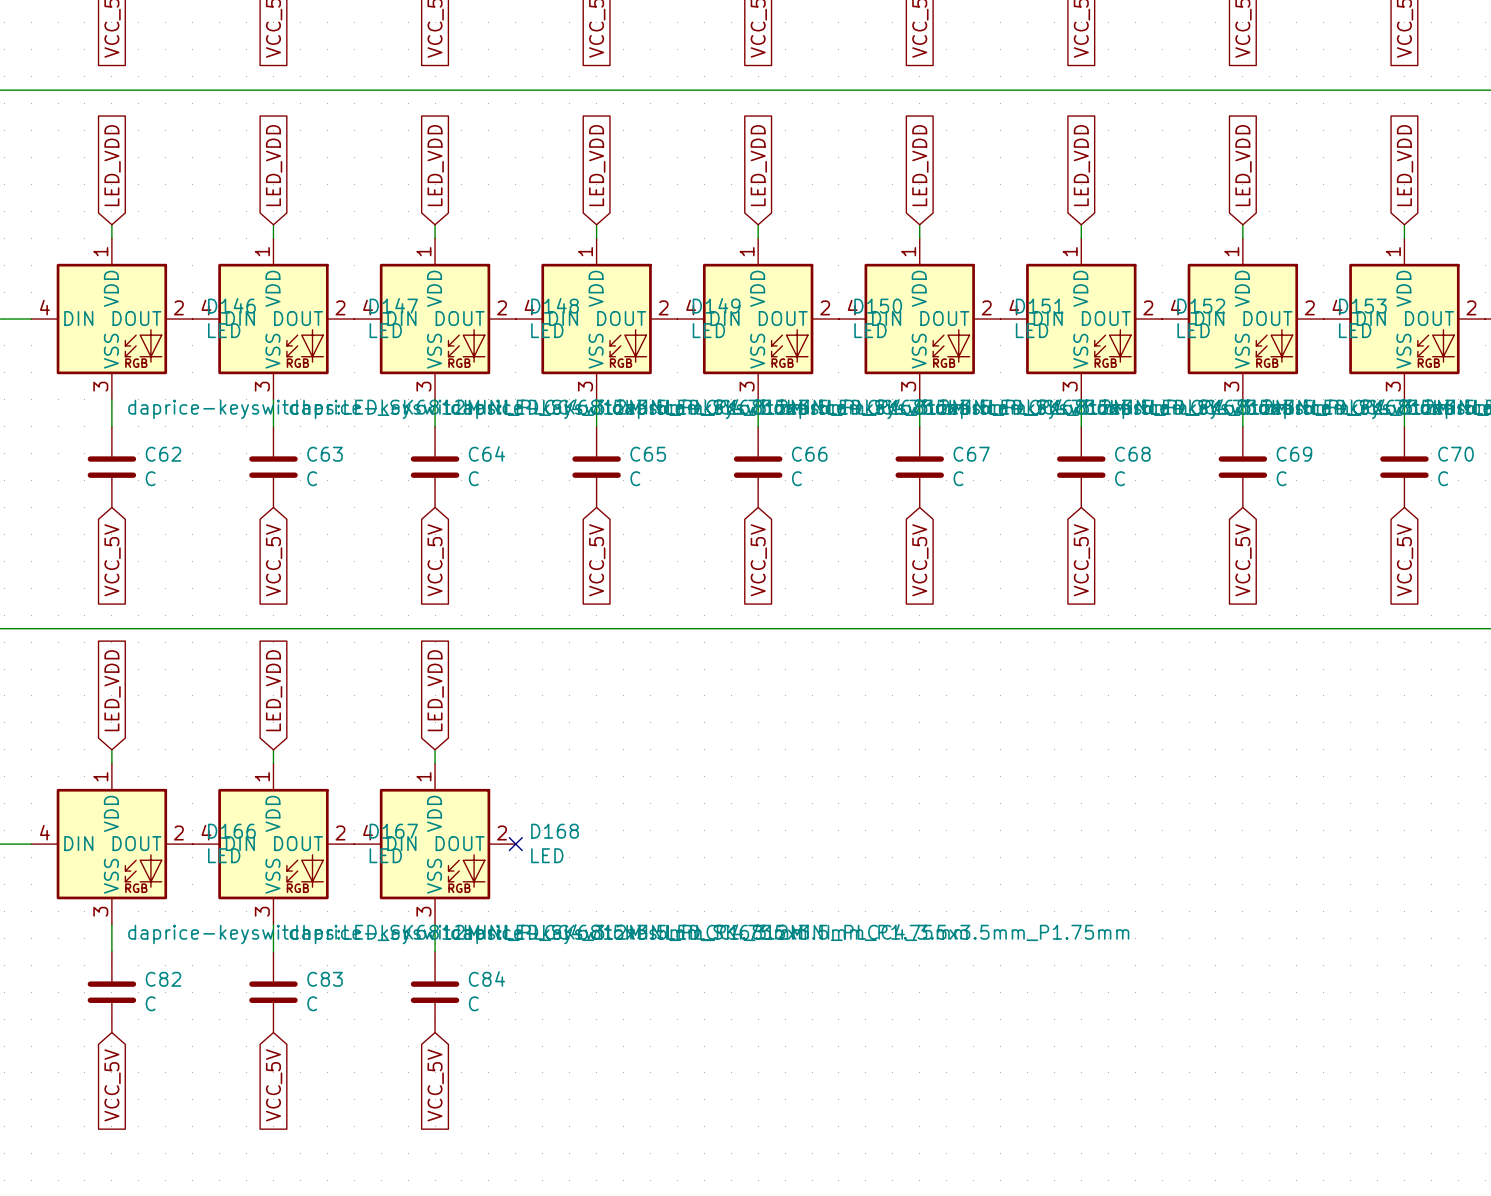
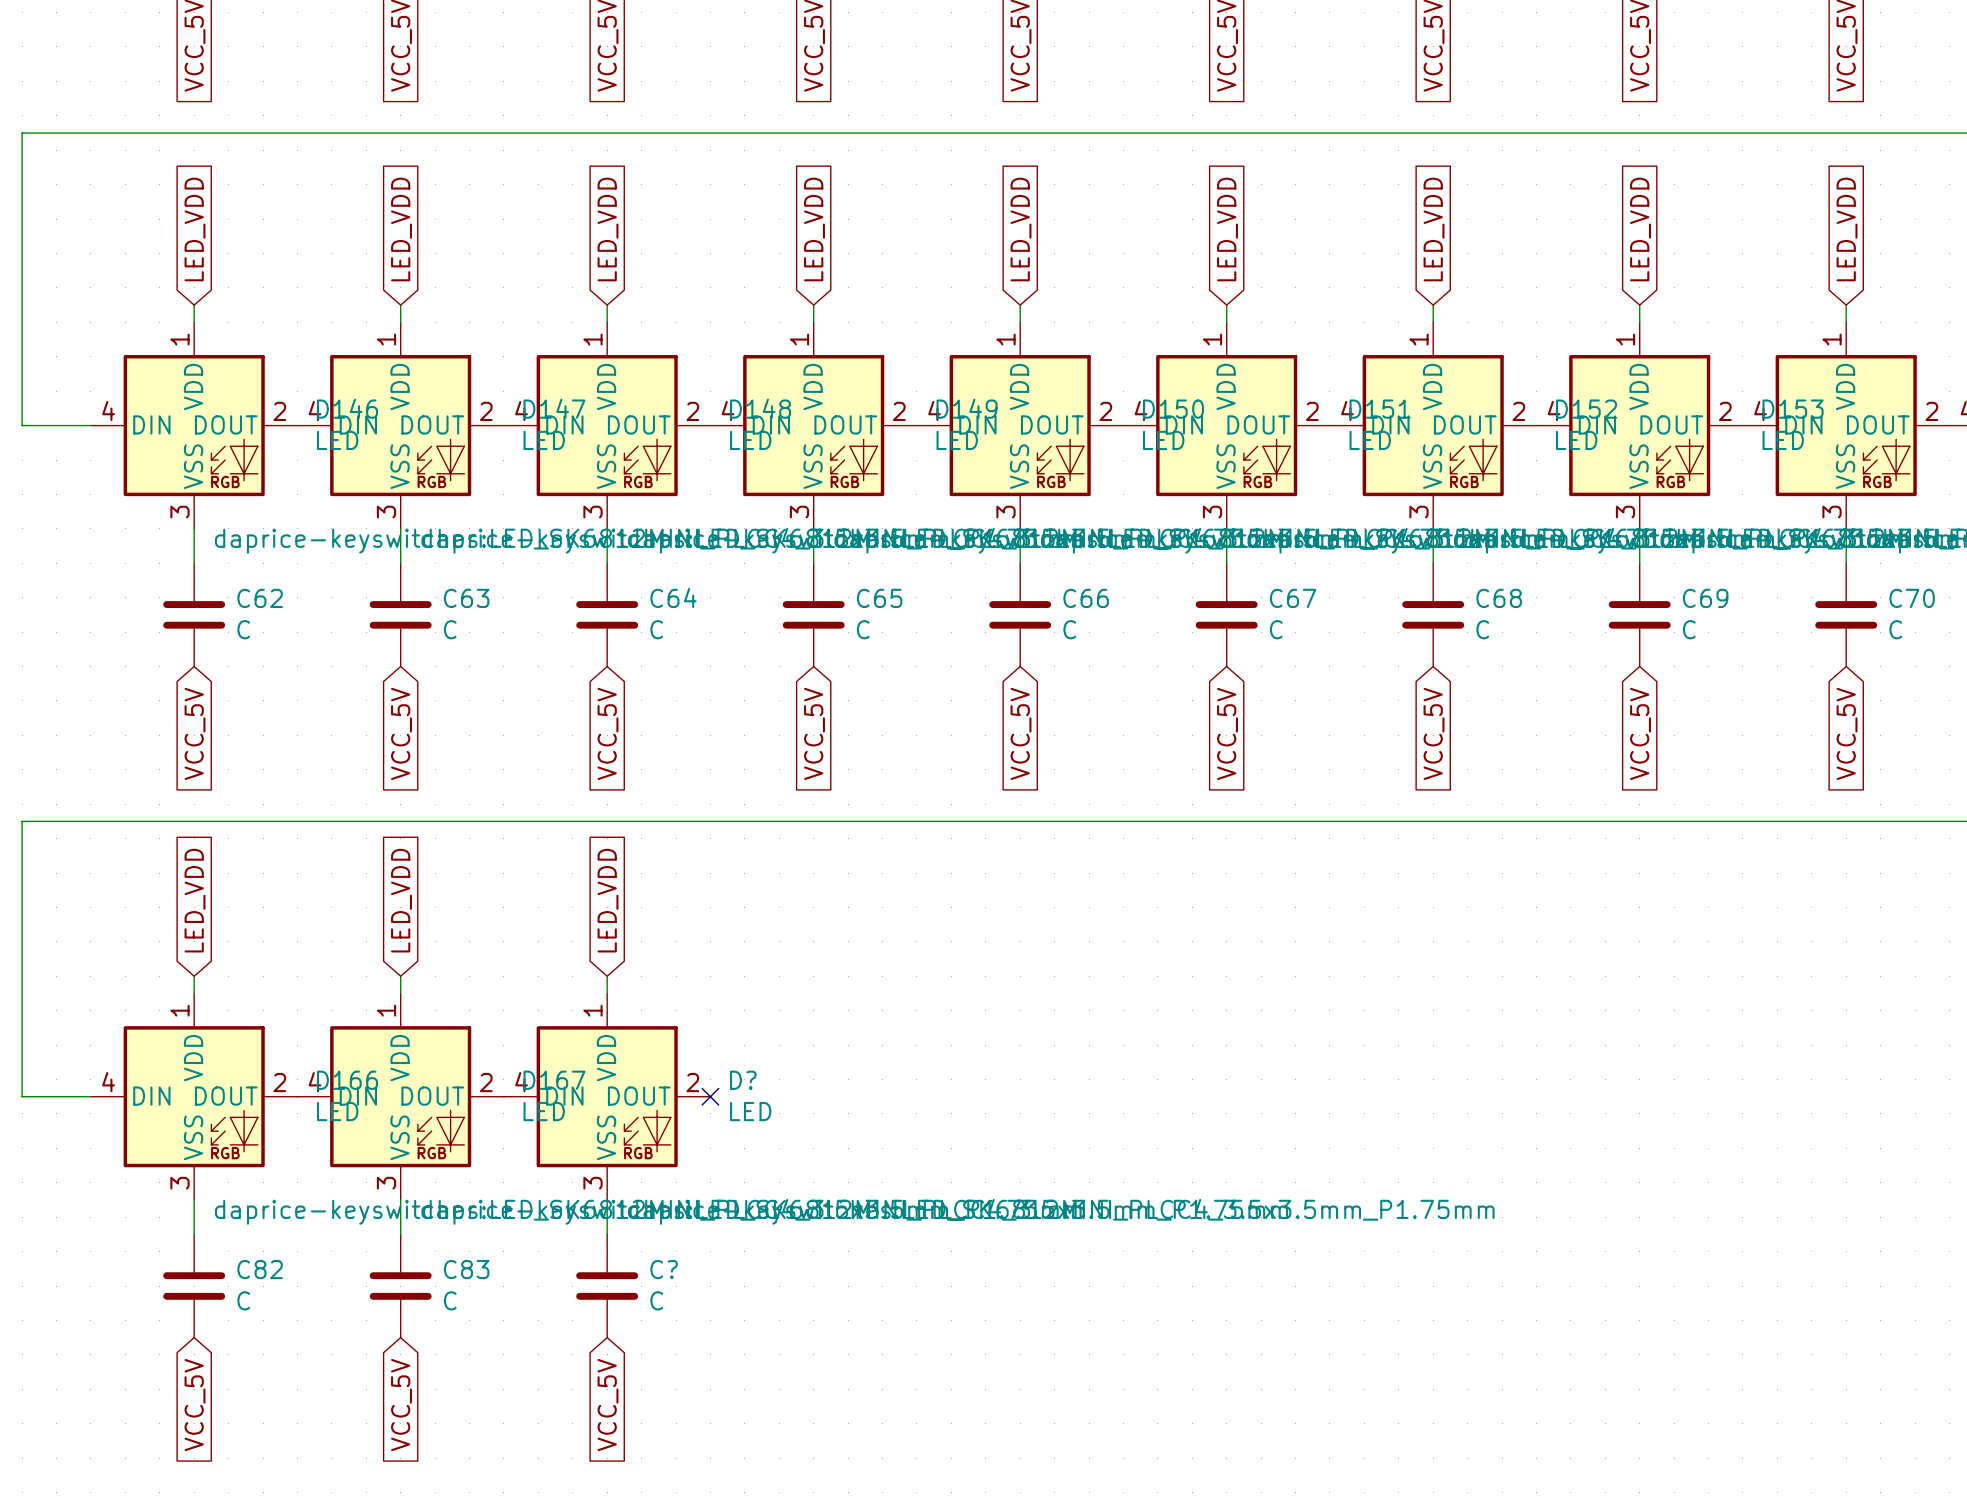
D168 name: D168 (555, 831) -> D? (743, 1080)
C84 name: C84 (486, 978) -> C? (664, 1269)

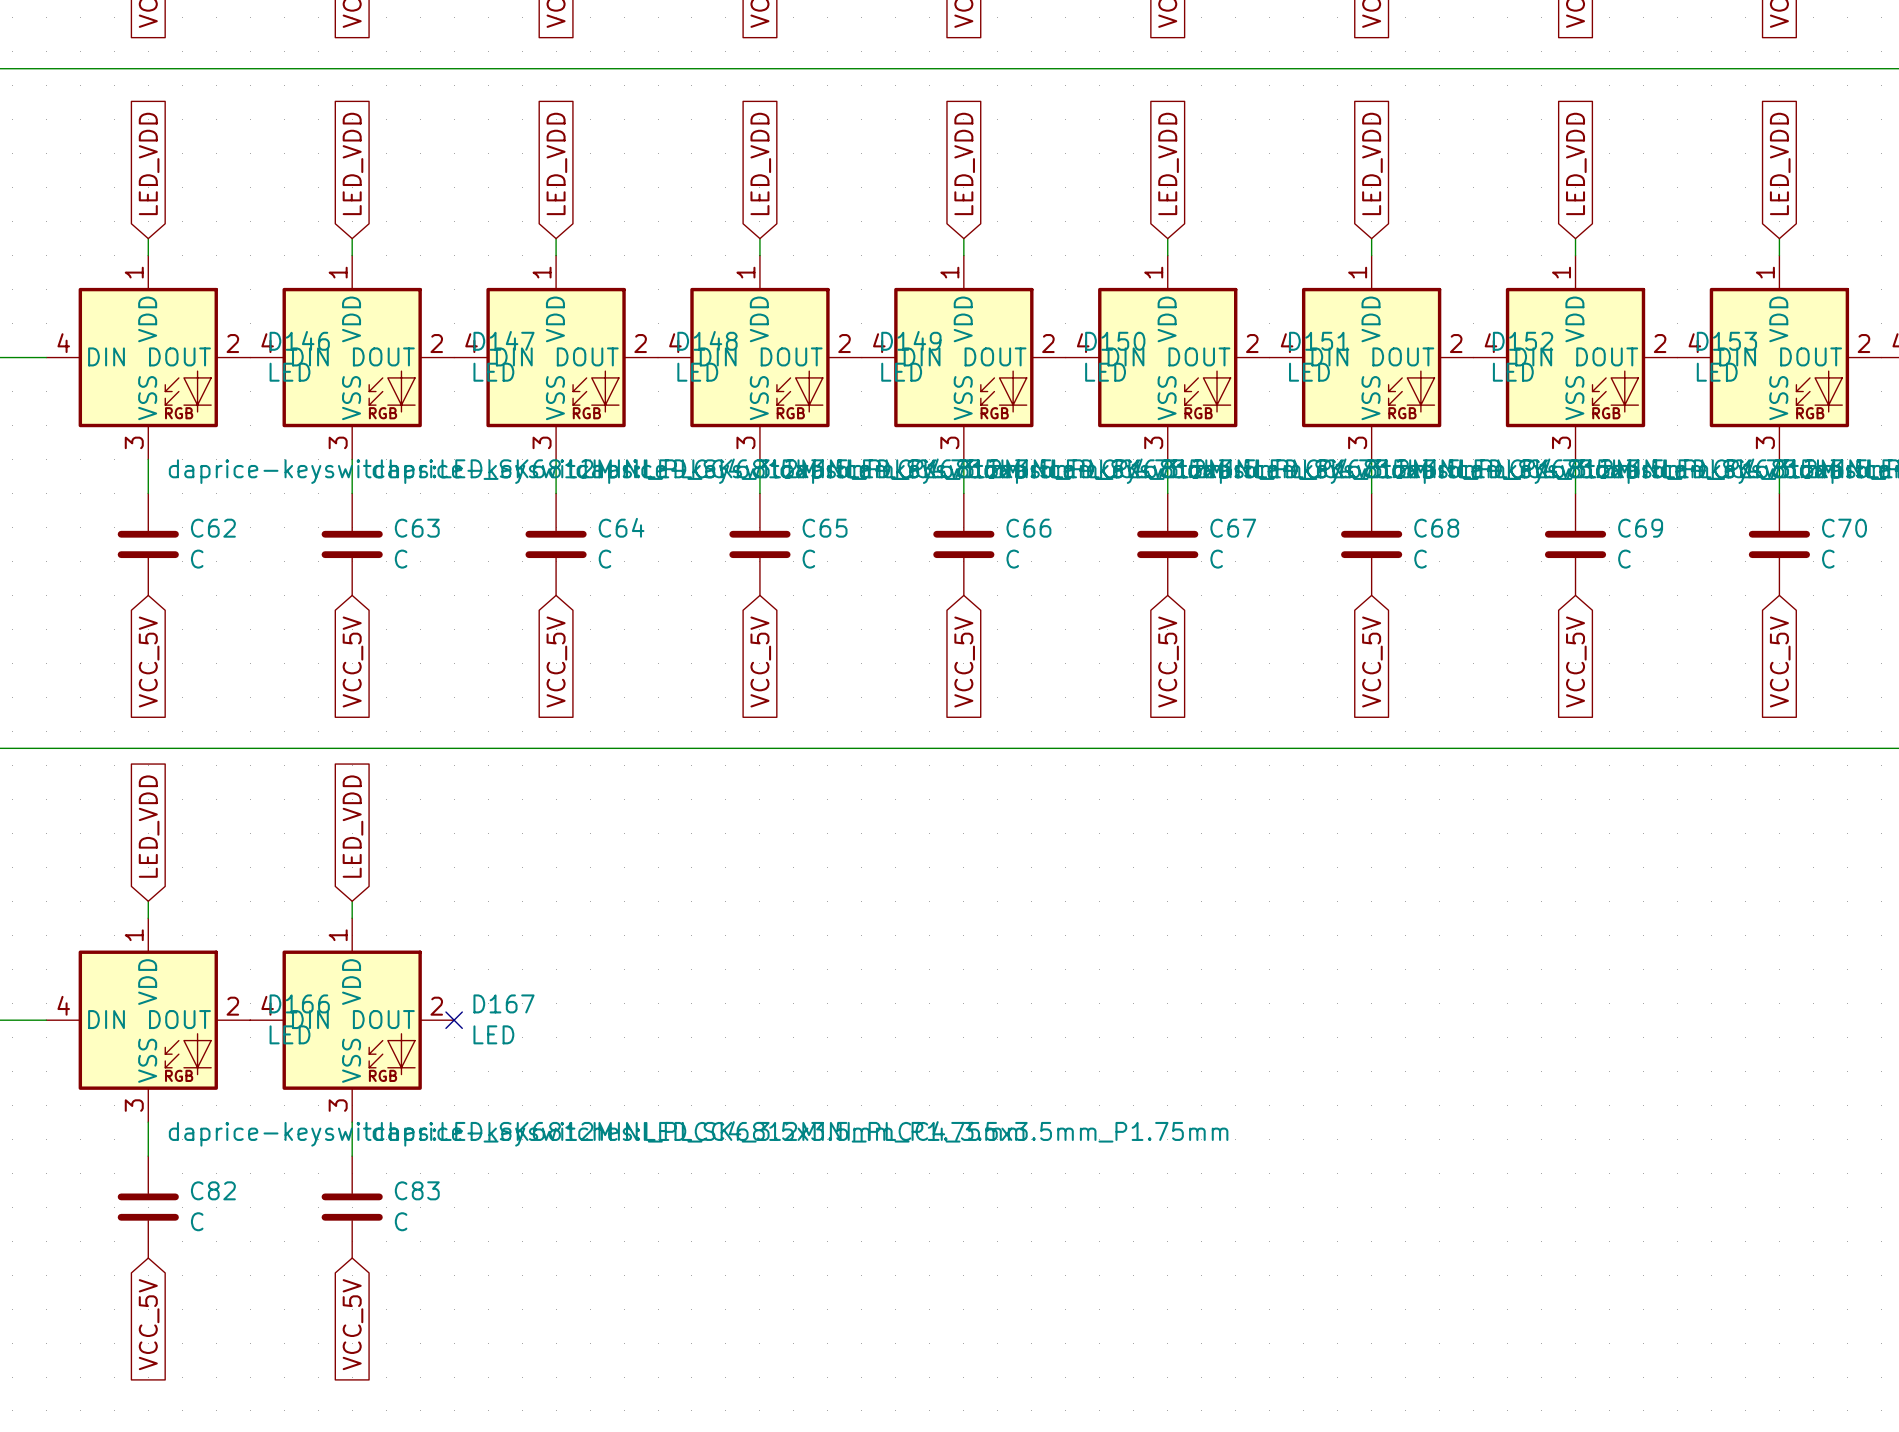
global label: LED_VDD (608, 900) -> none
wire: (607, 976) (607, 993) -> none
no-connect mark: none -> (454, 1020)
D?: LED (607, 1096) -> none
no-connect mark: (710, 1096) -> none
wire: (607, 1199) (607, 1234) -> none
C?: C (607, 1286) -> none
global label: VCC_5V (608, 1405) -> none

